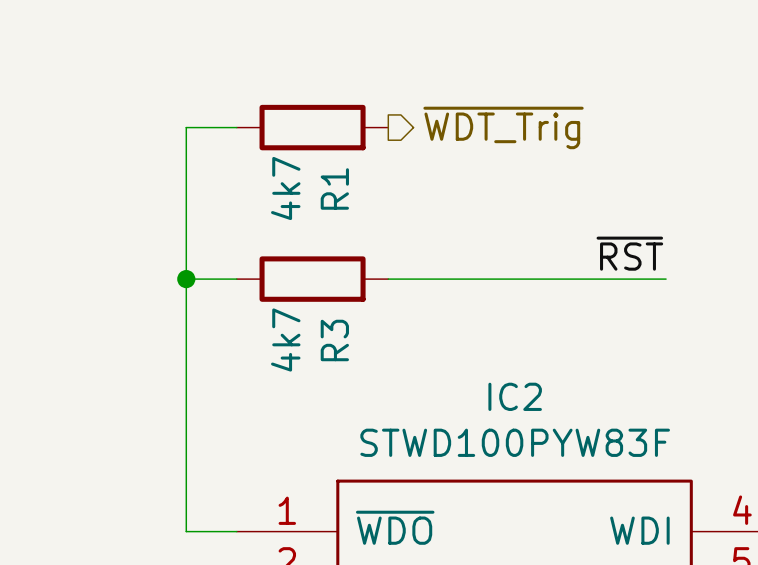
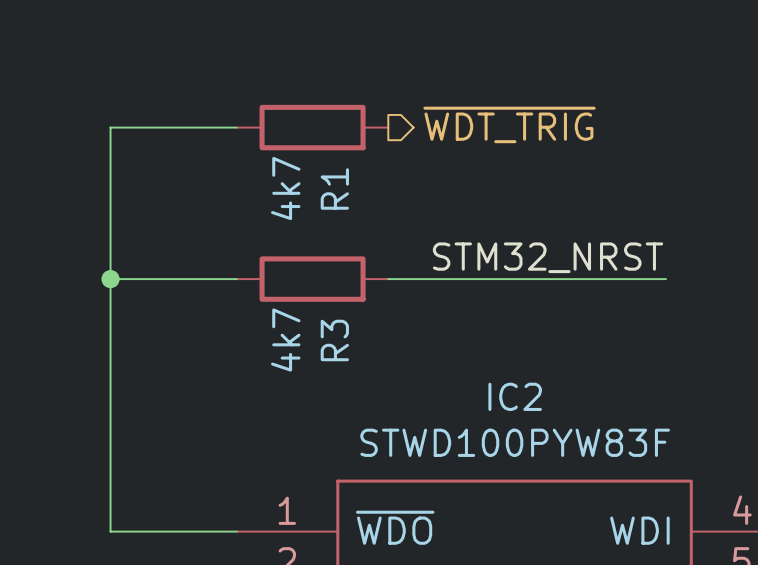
wire: (186, 127) (186, 531) -> (186, 127) (110, 127) (110, 531) (186, 531)
hierarchical label: ~{WDT_Trig} (503, 127) -> ~{WDT_TRIG} (509, 124)
label: ~{RST} (629, 253) -> STM32_NRST (548, 257)
wire: none -> (110, 279) (186, 279)
junction position: (186, 279) -> (110, 279)

